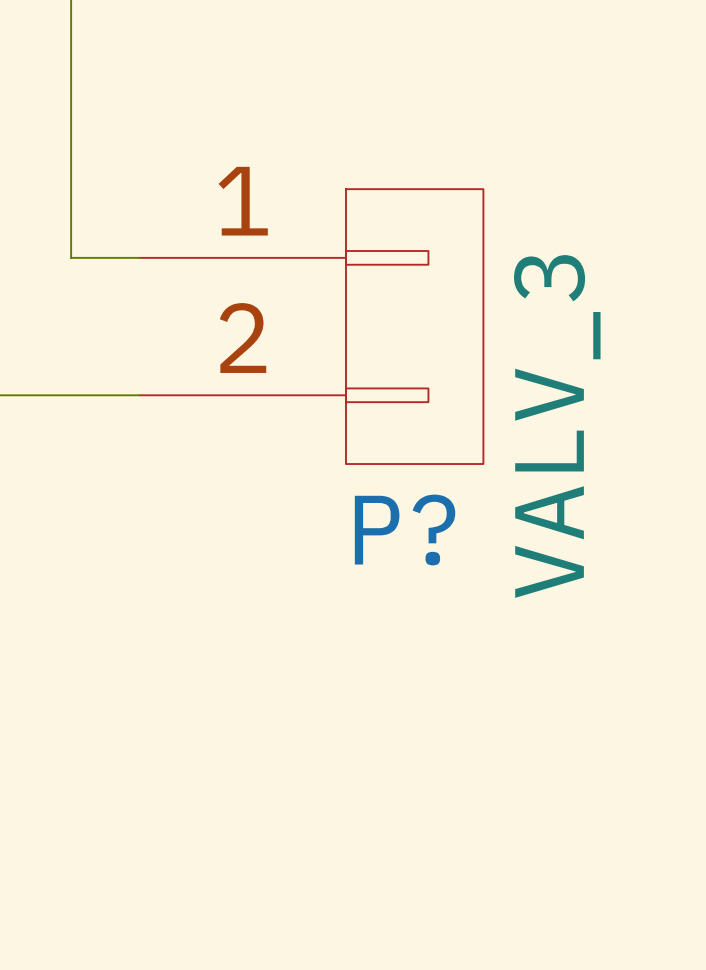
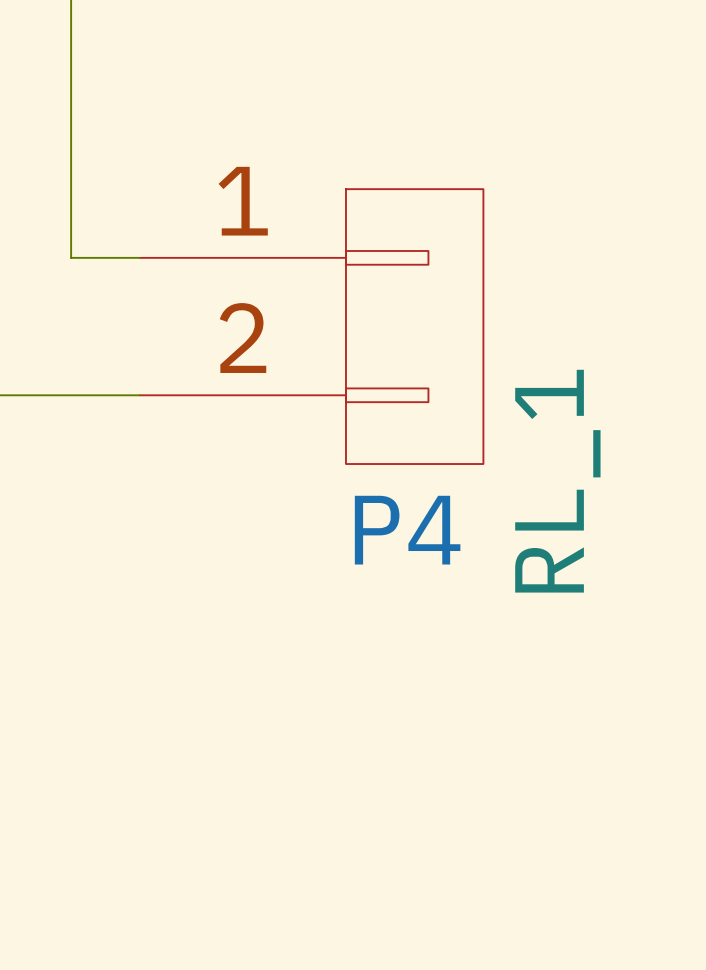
P? value: VALV_3 (557, 426) -> RL_1 (557, 481)
P? name: P? (405, 530) -> P4 (407, 530)

